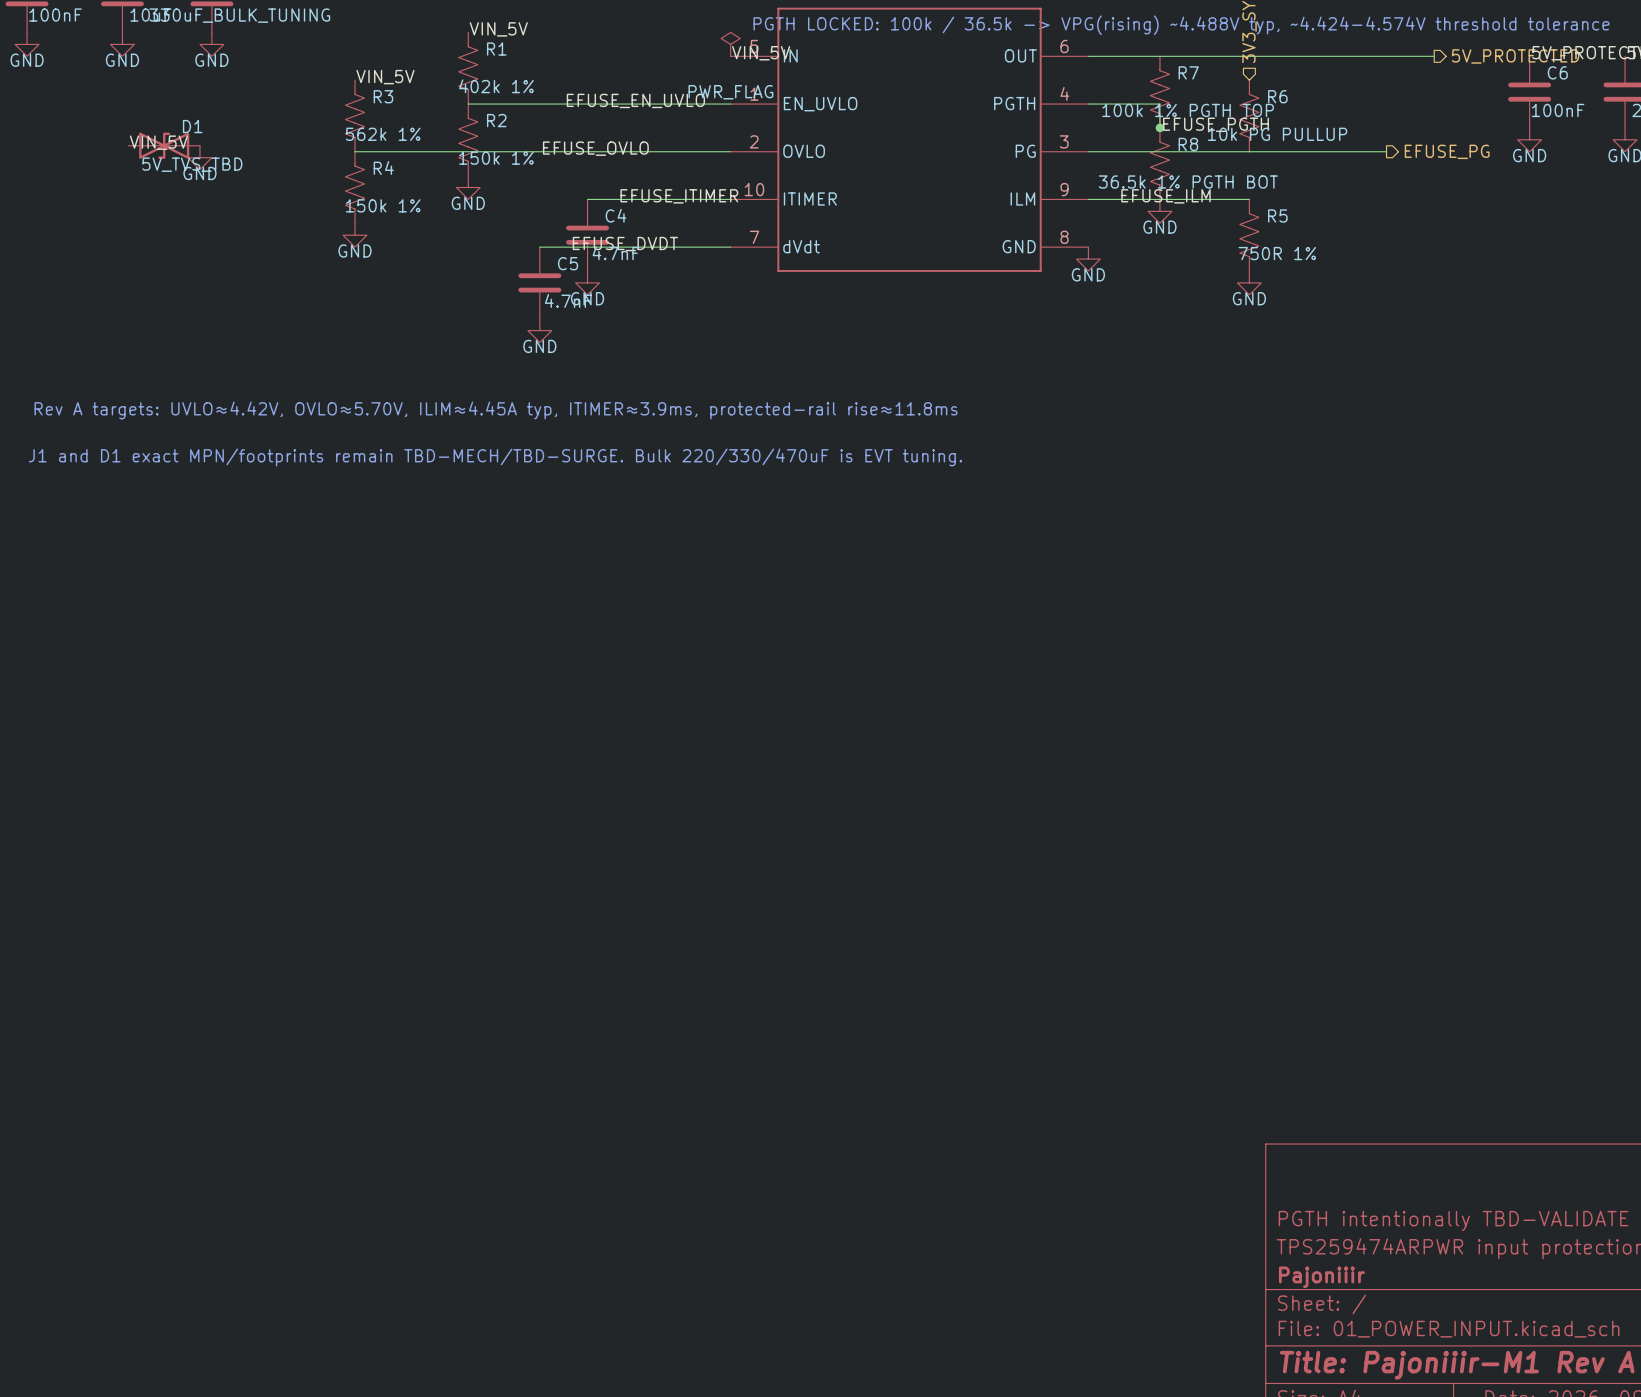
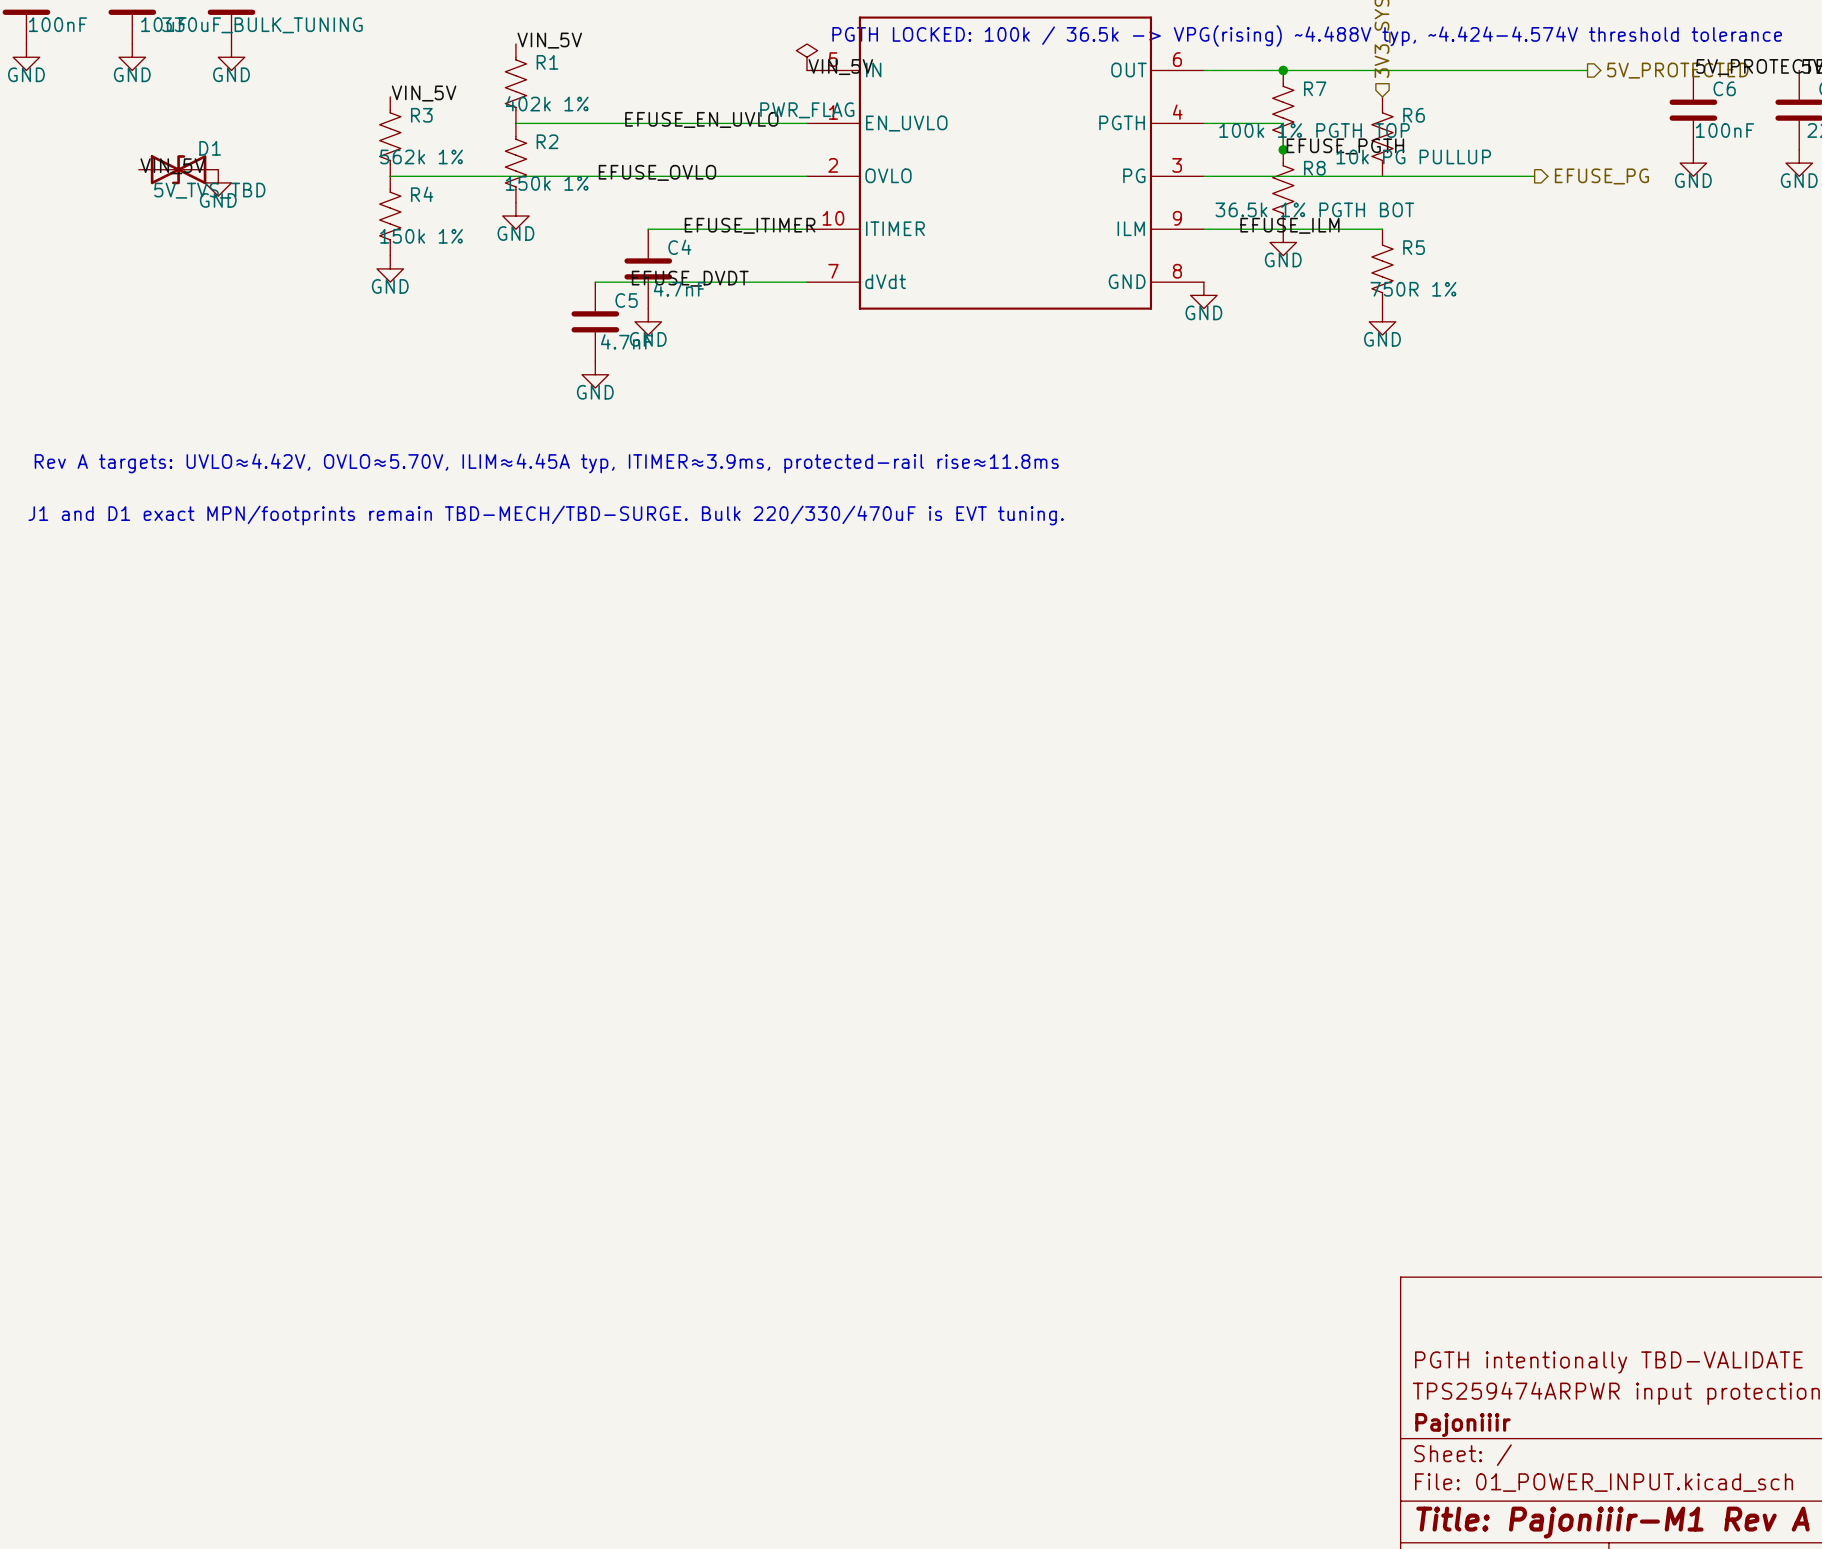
junction: none -> (1283, 70)

